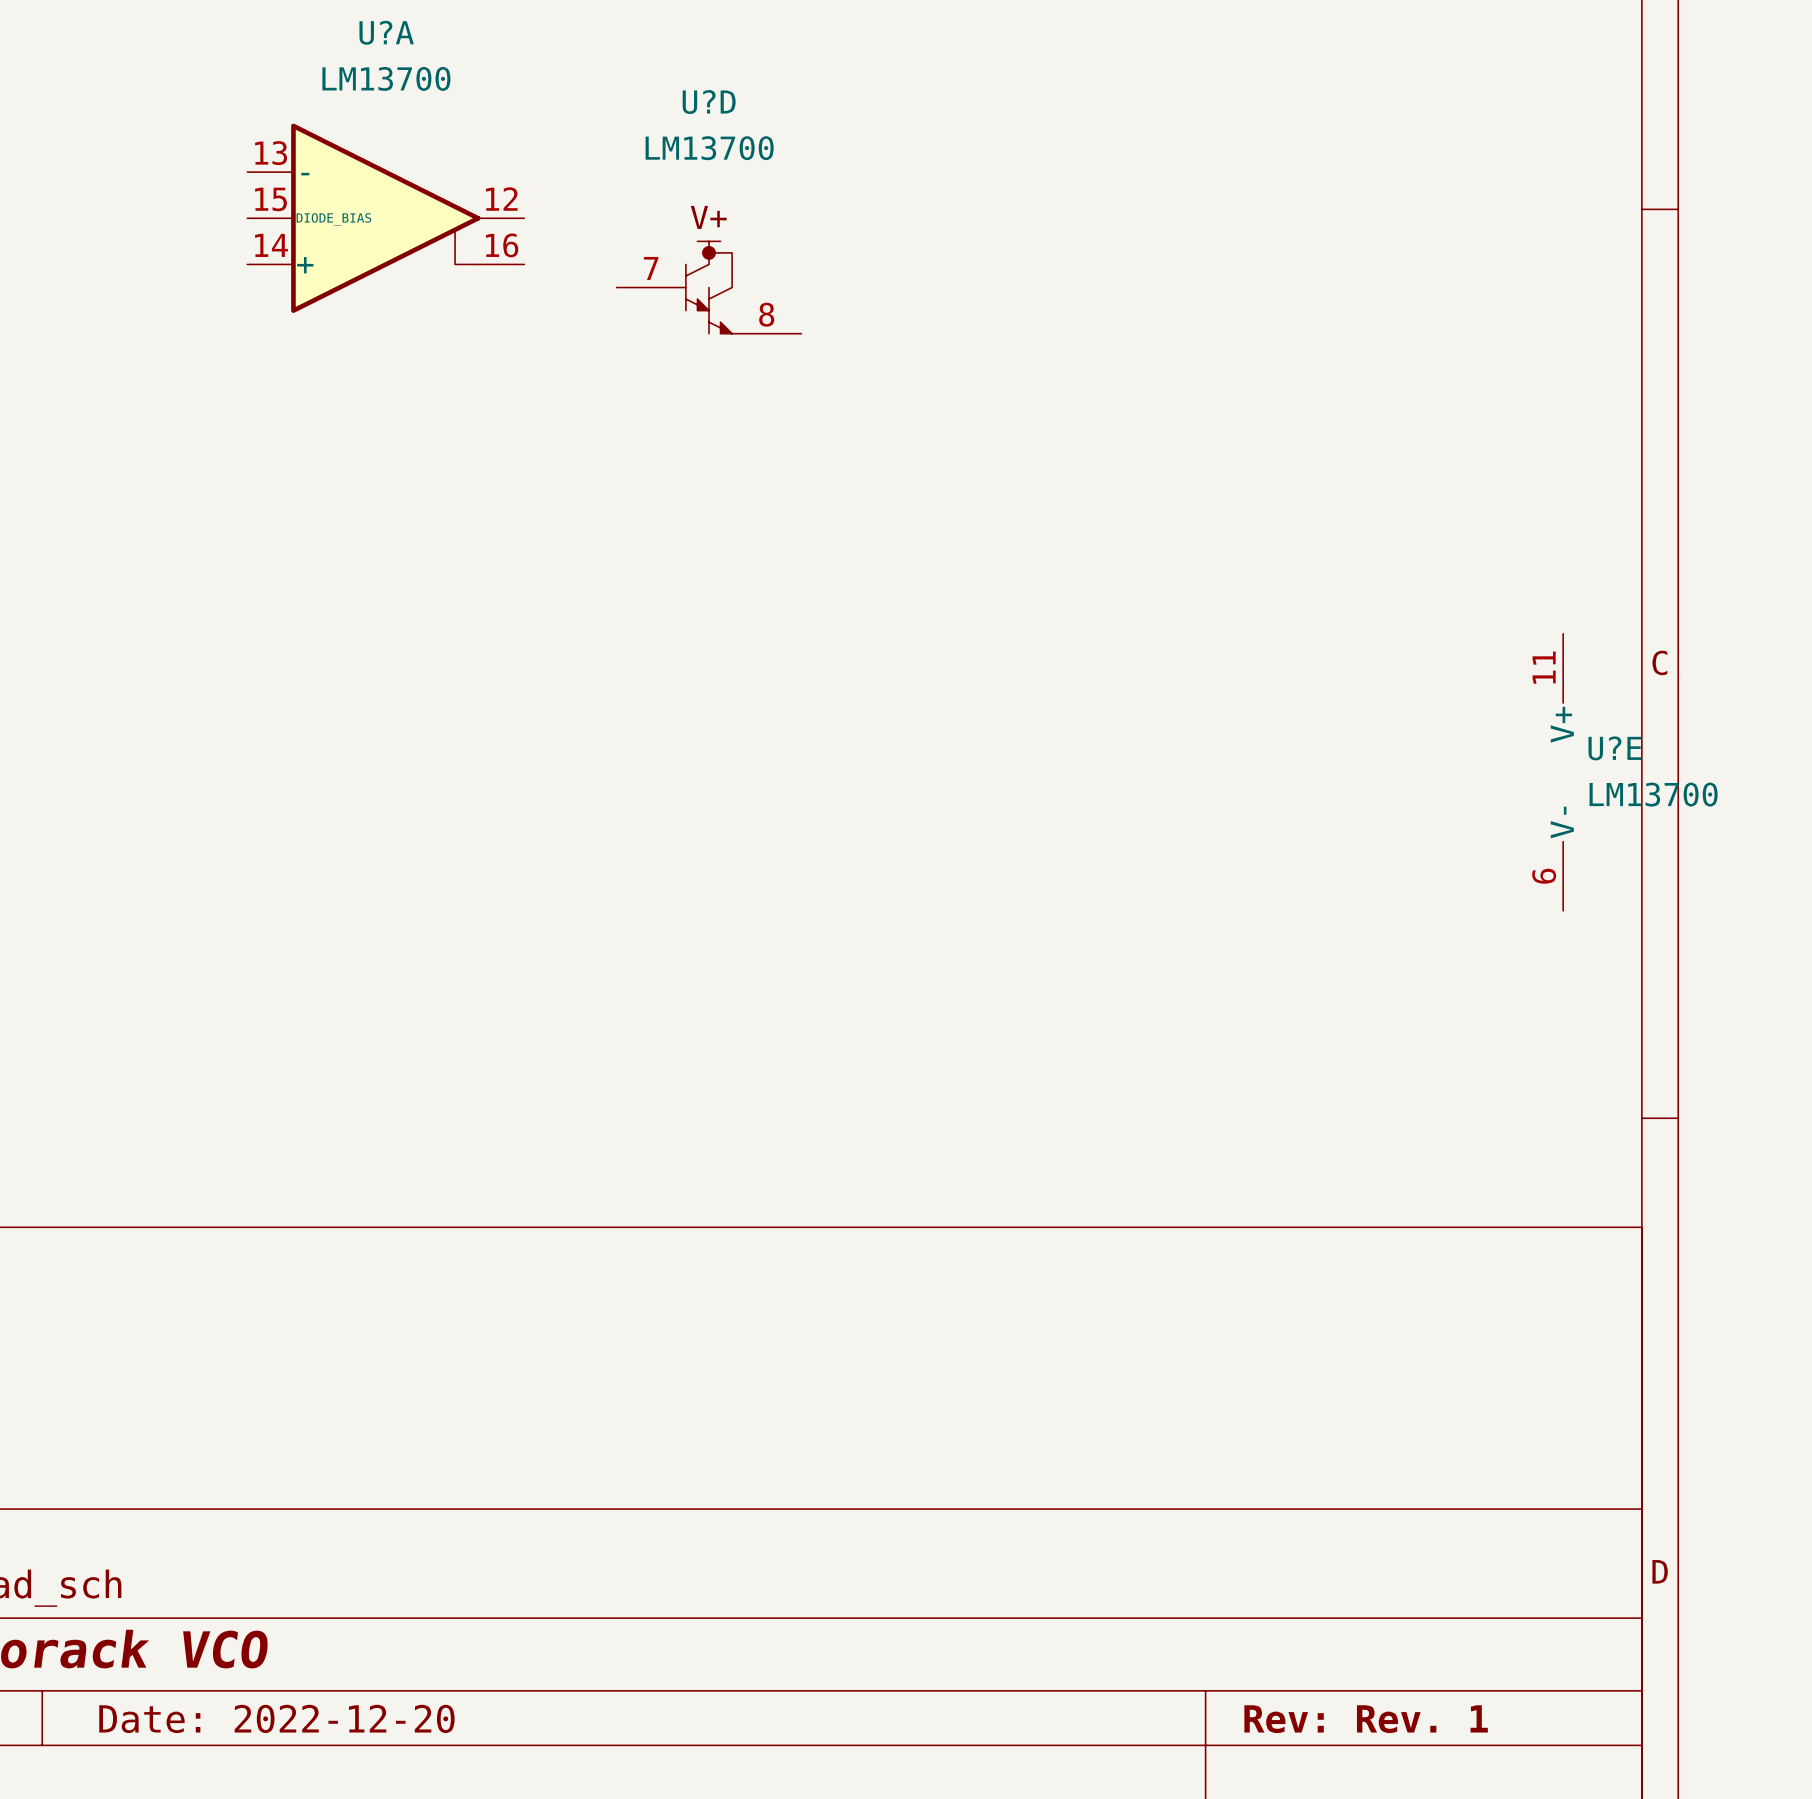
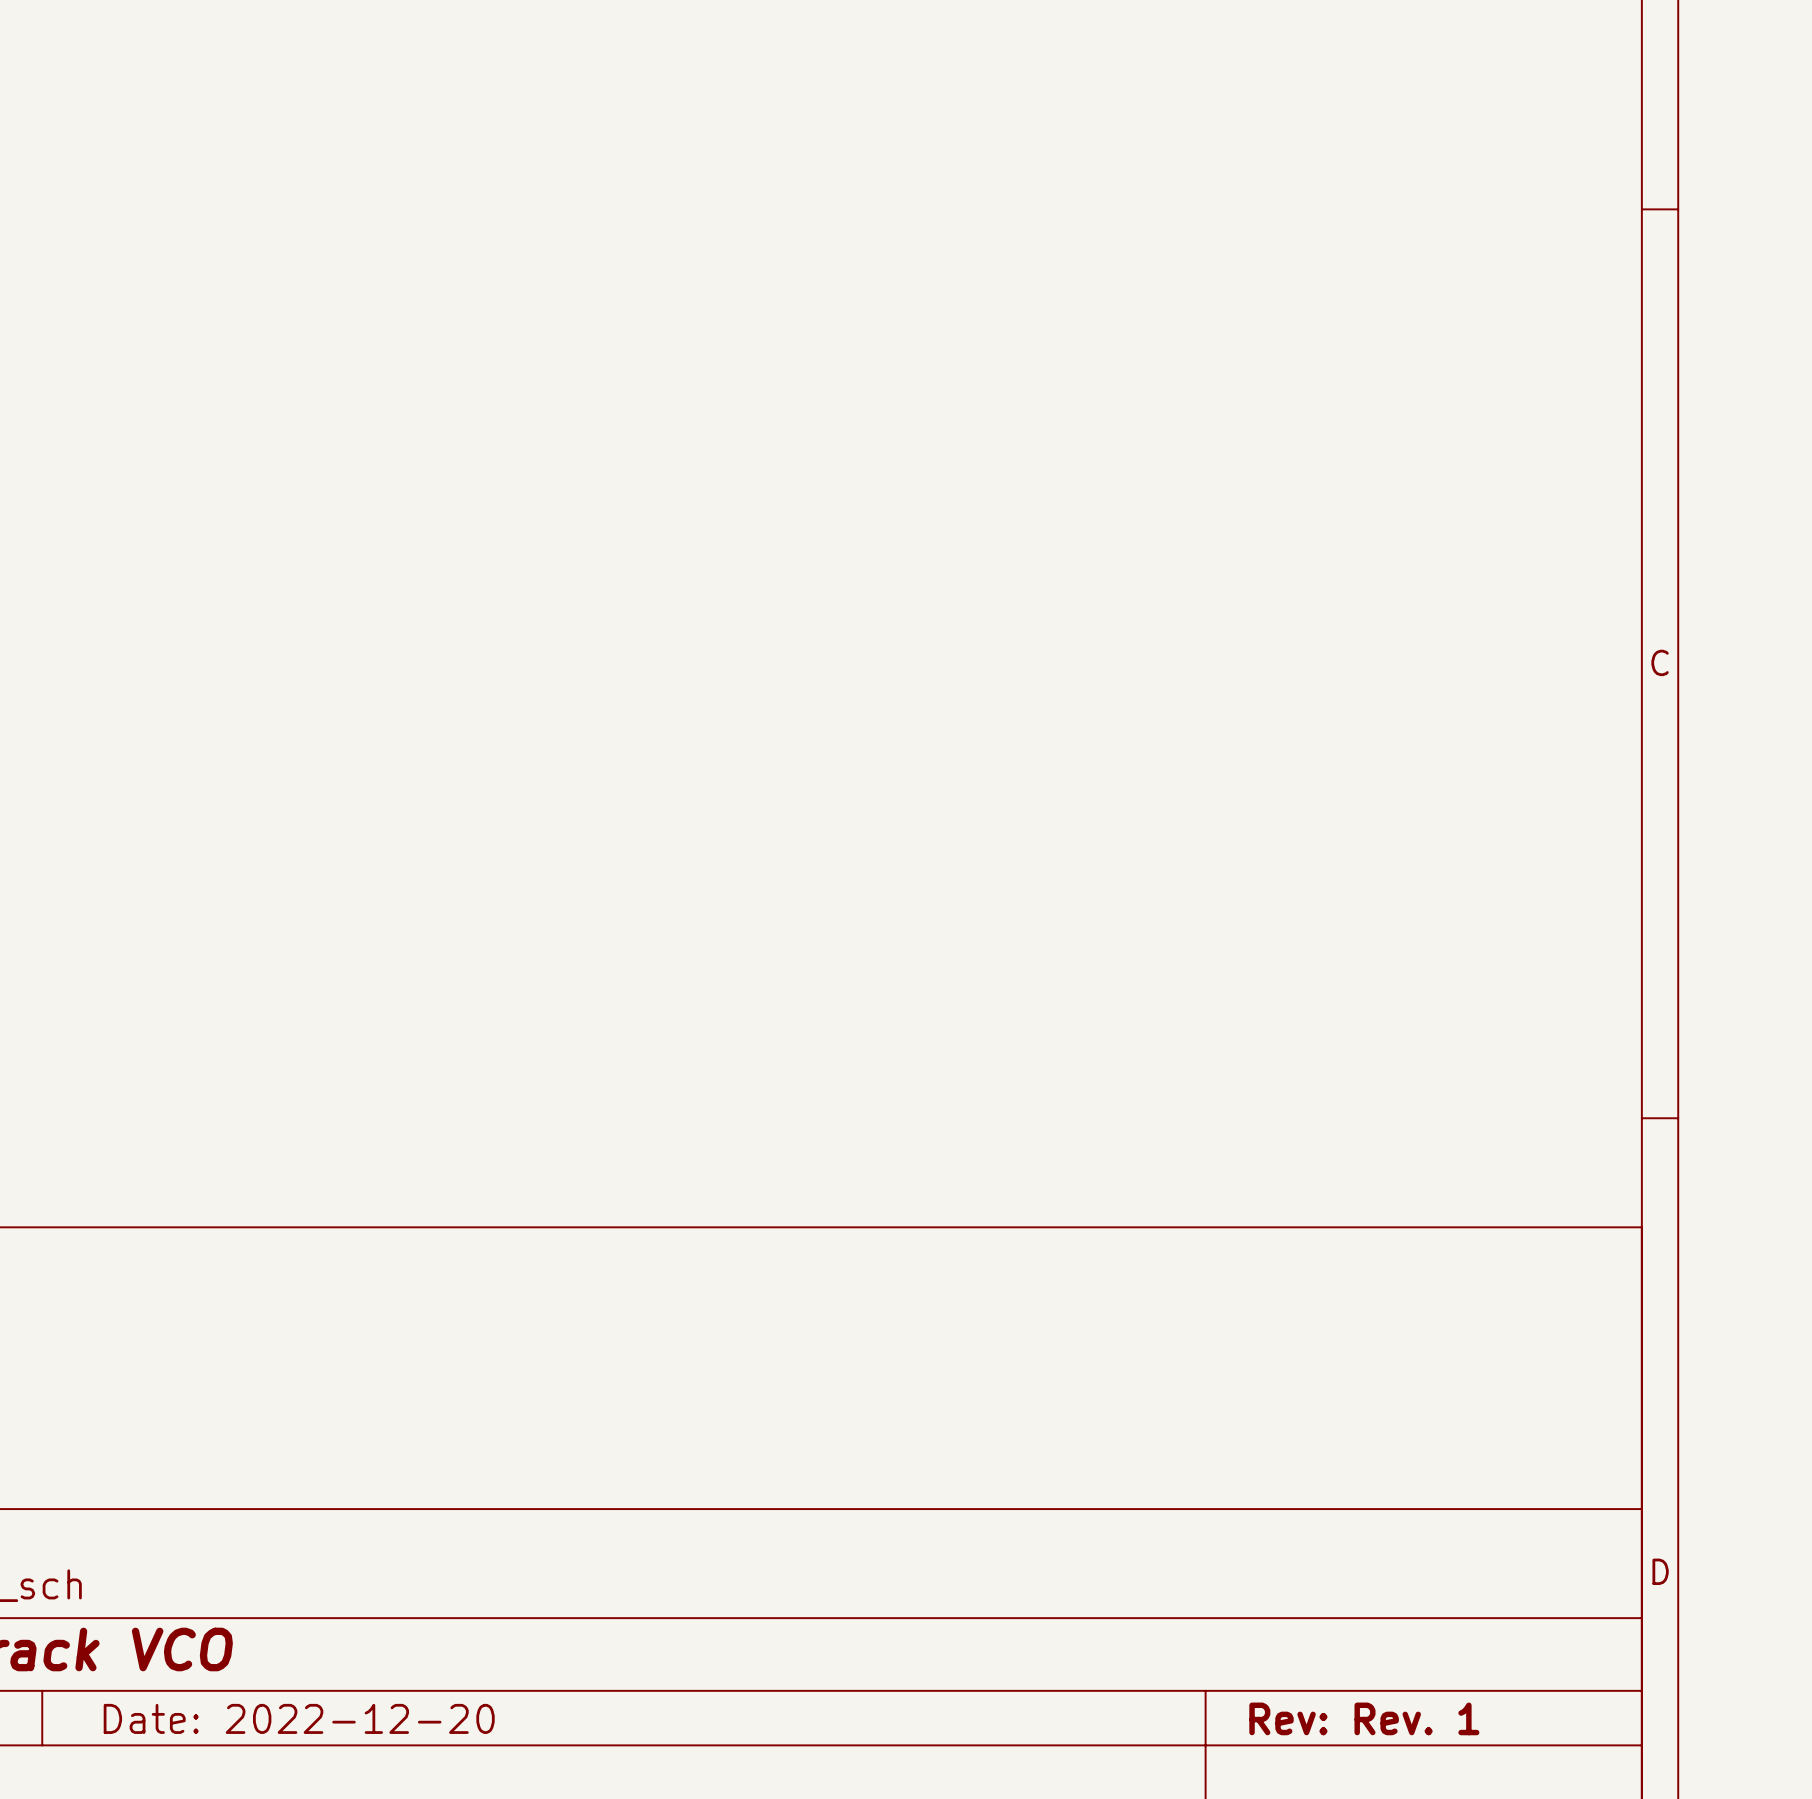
U?A: LM13700 (385, 218) -> none
U?D: LM13700 (708, 287) -> none
U?E: LM13700 (1563, 772) -> none

